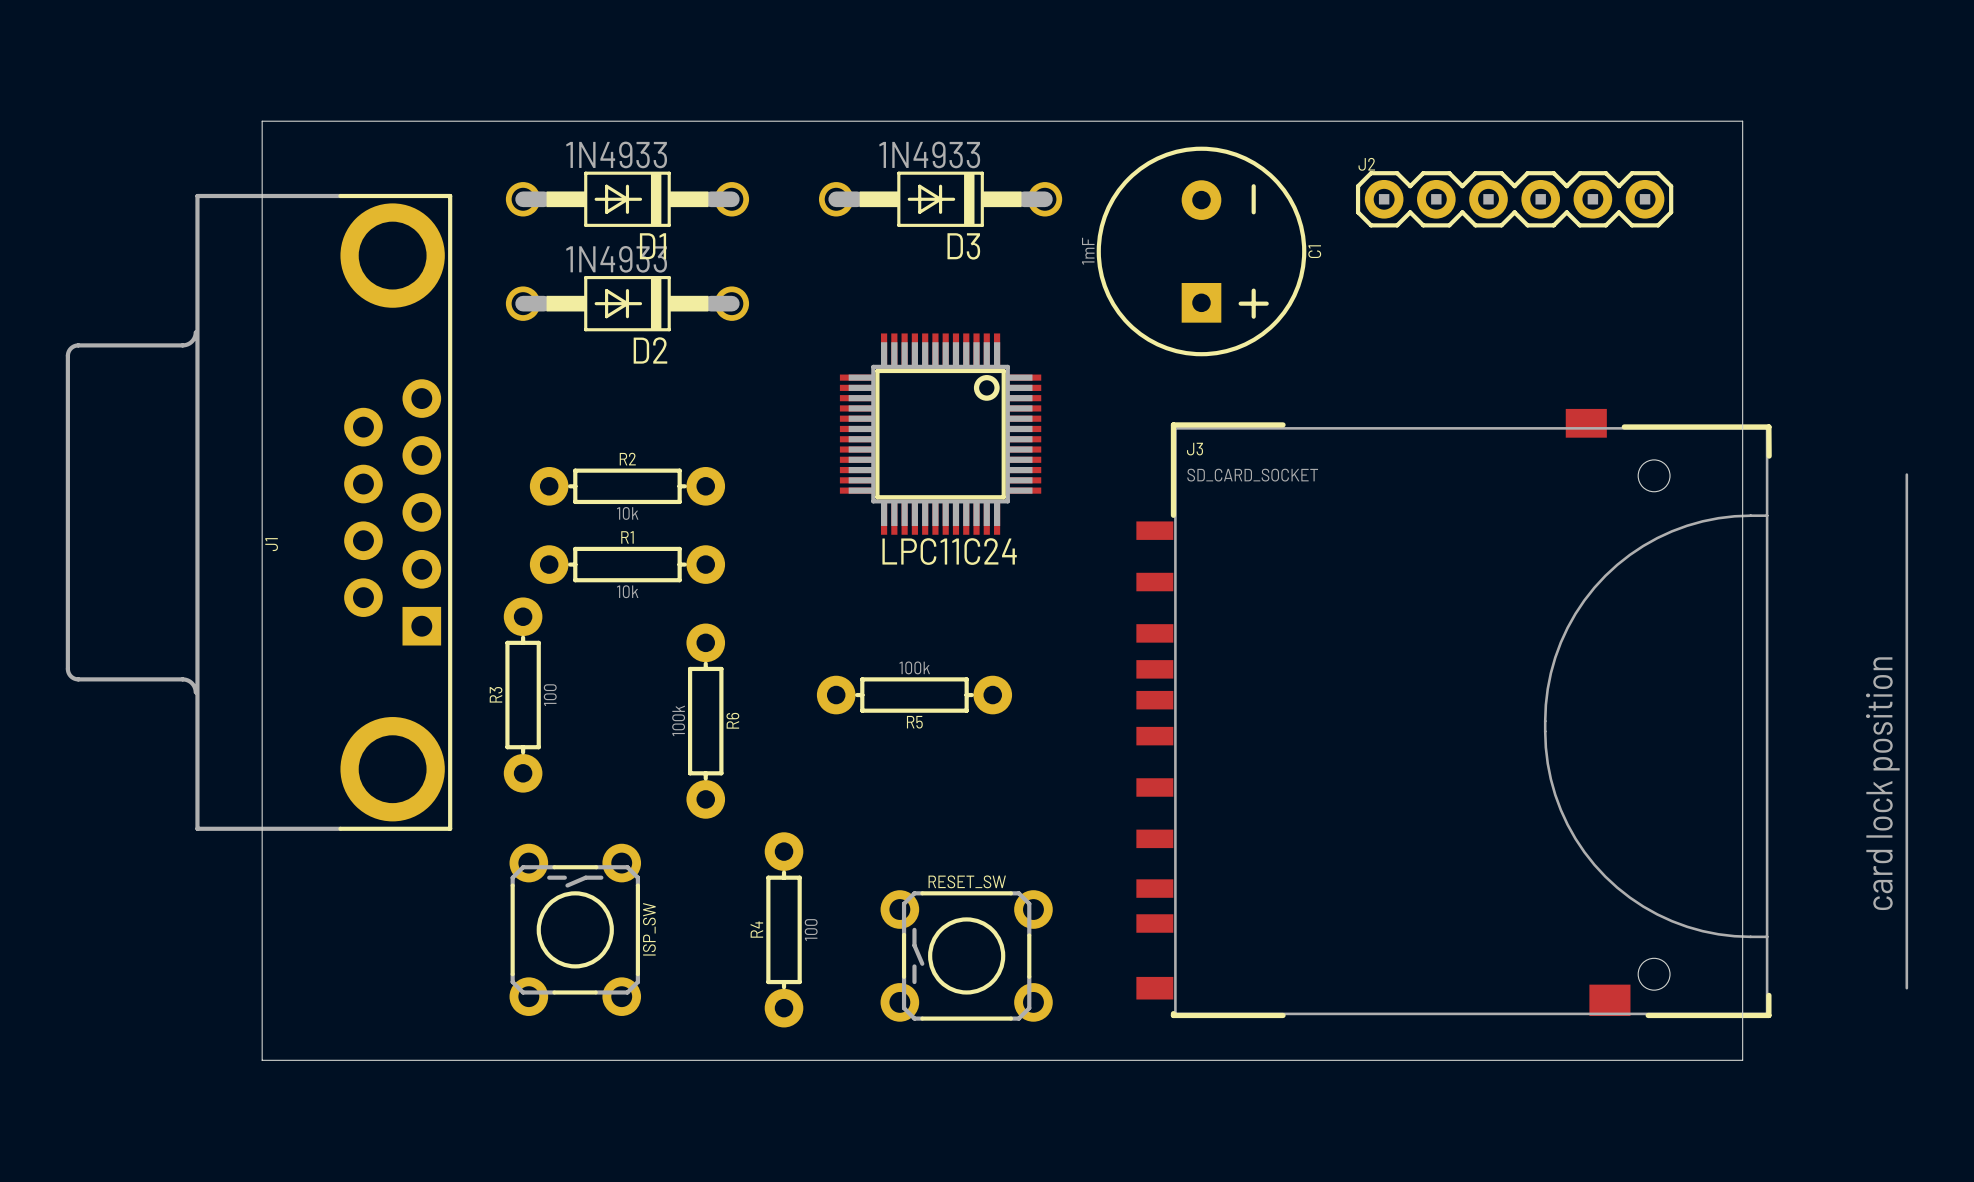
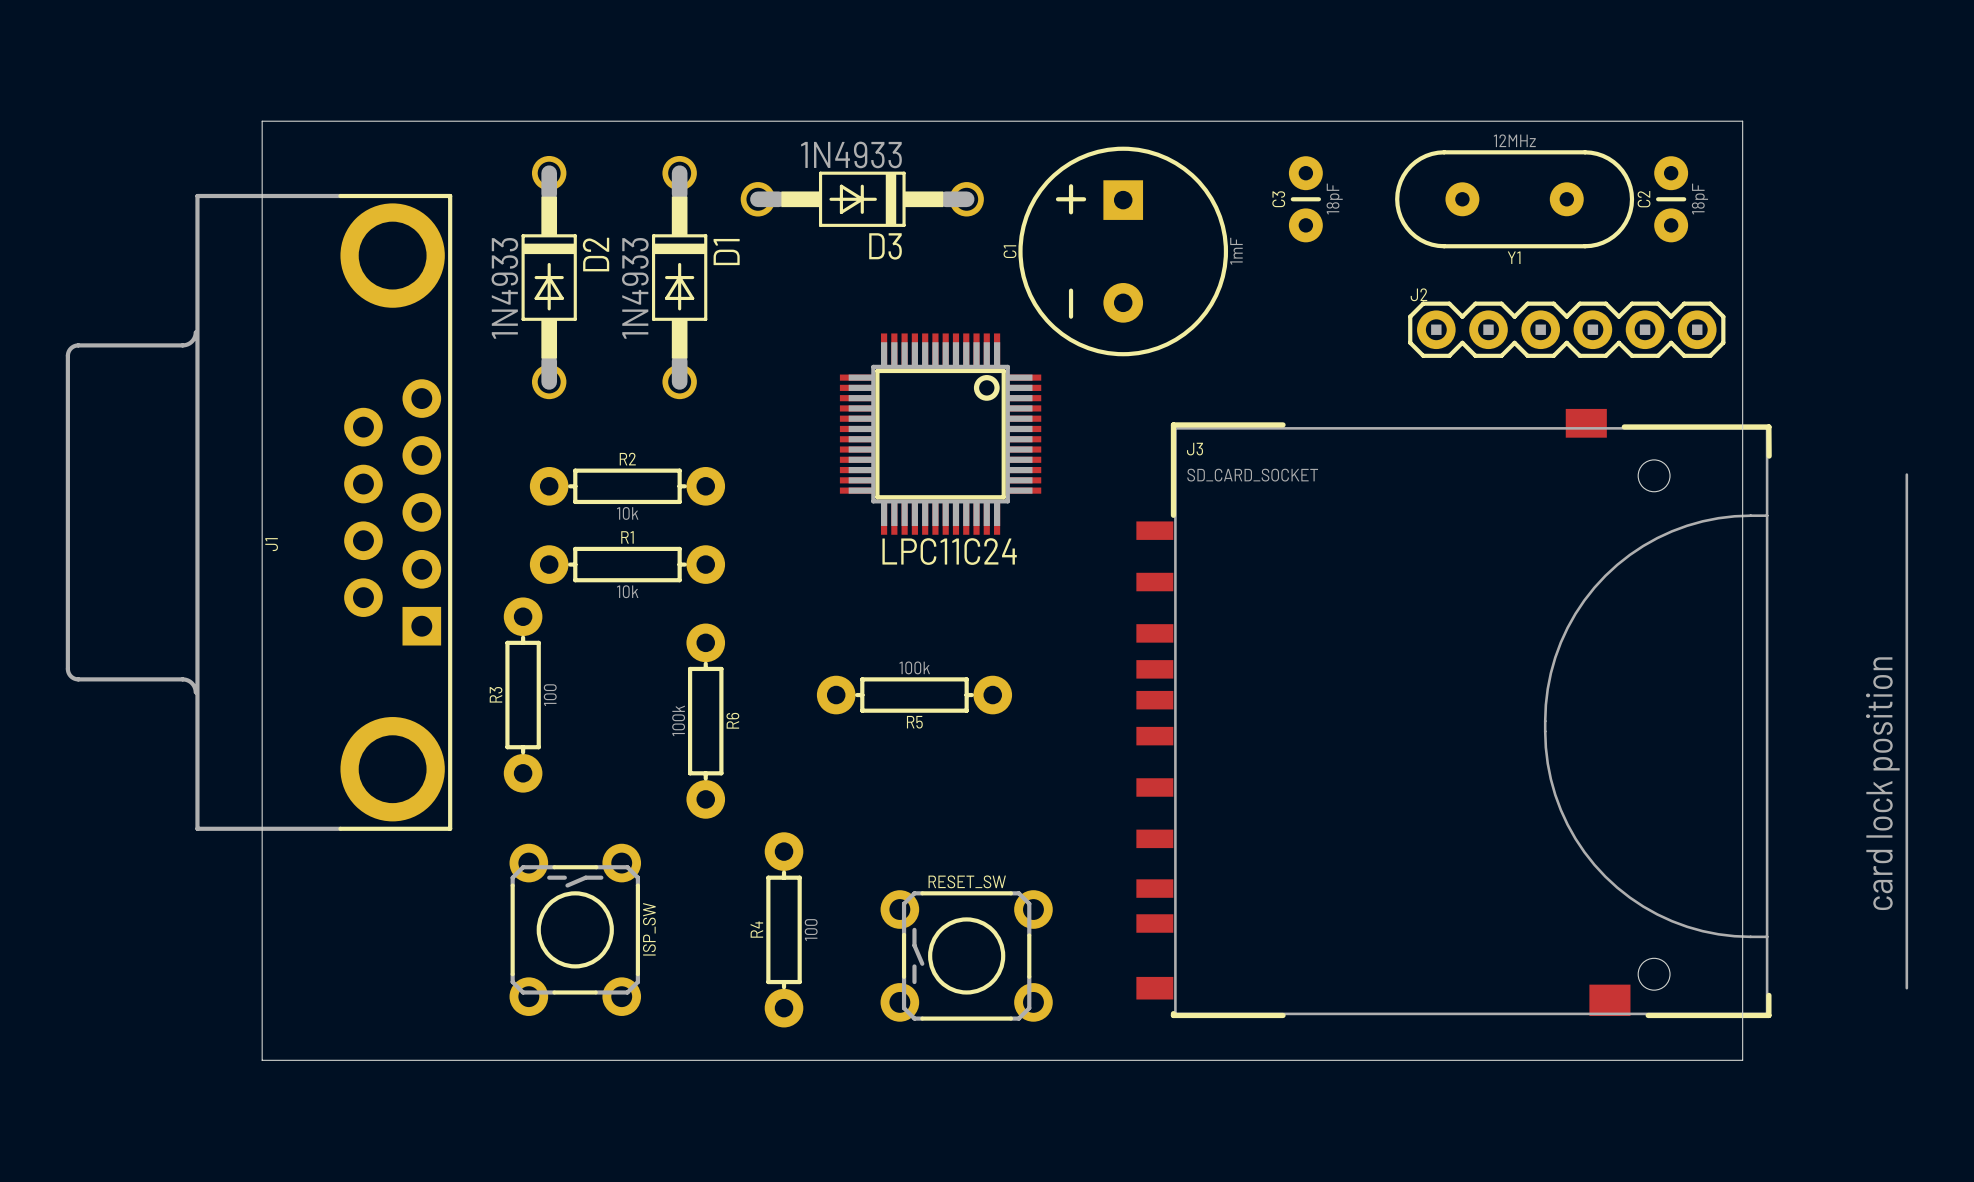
D1 rotation: 0° (627, 199) -> 90° counterclockwise (679, 277)
D3 position: (940, 199) -> (862, 199)
C3: none -> 18pF (1305, 199)
J2 position: (1514, 199) -> (1566, 329)
Y1: none -> 12MHz (1514, 199)
C2: none -> 18pF (1671, 199)
C1 rotation: 0° (1201, 251) -> 180° (1123, 251)
D2 rotation: 0° (627, 303) -> 90° counterclockwise (549, 277)

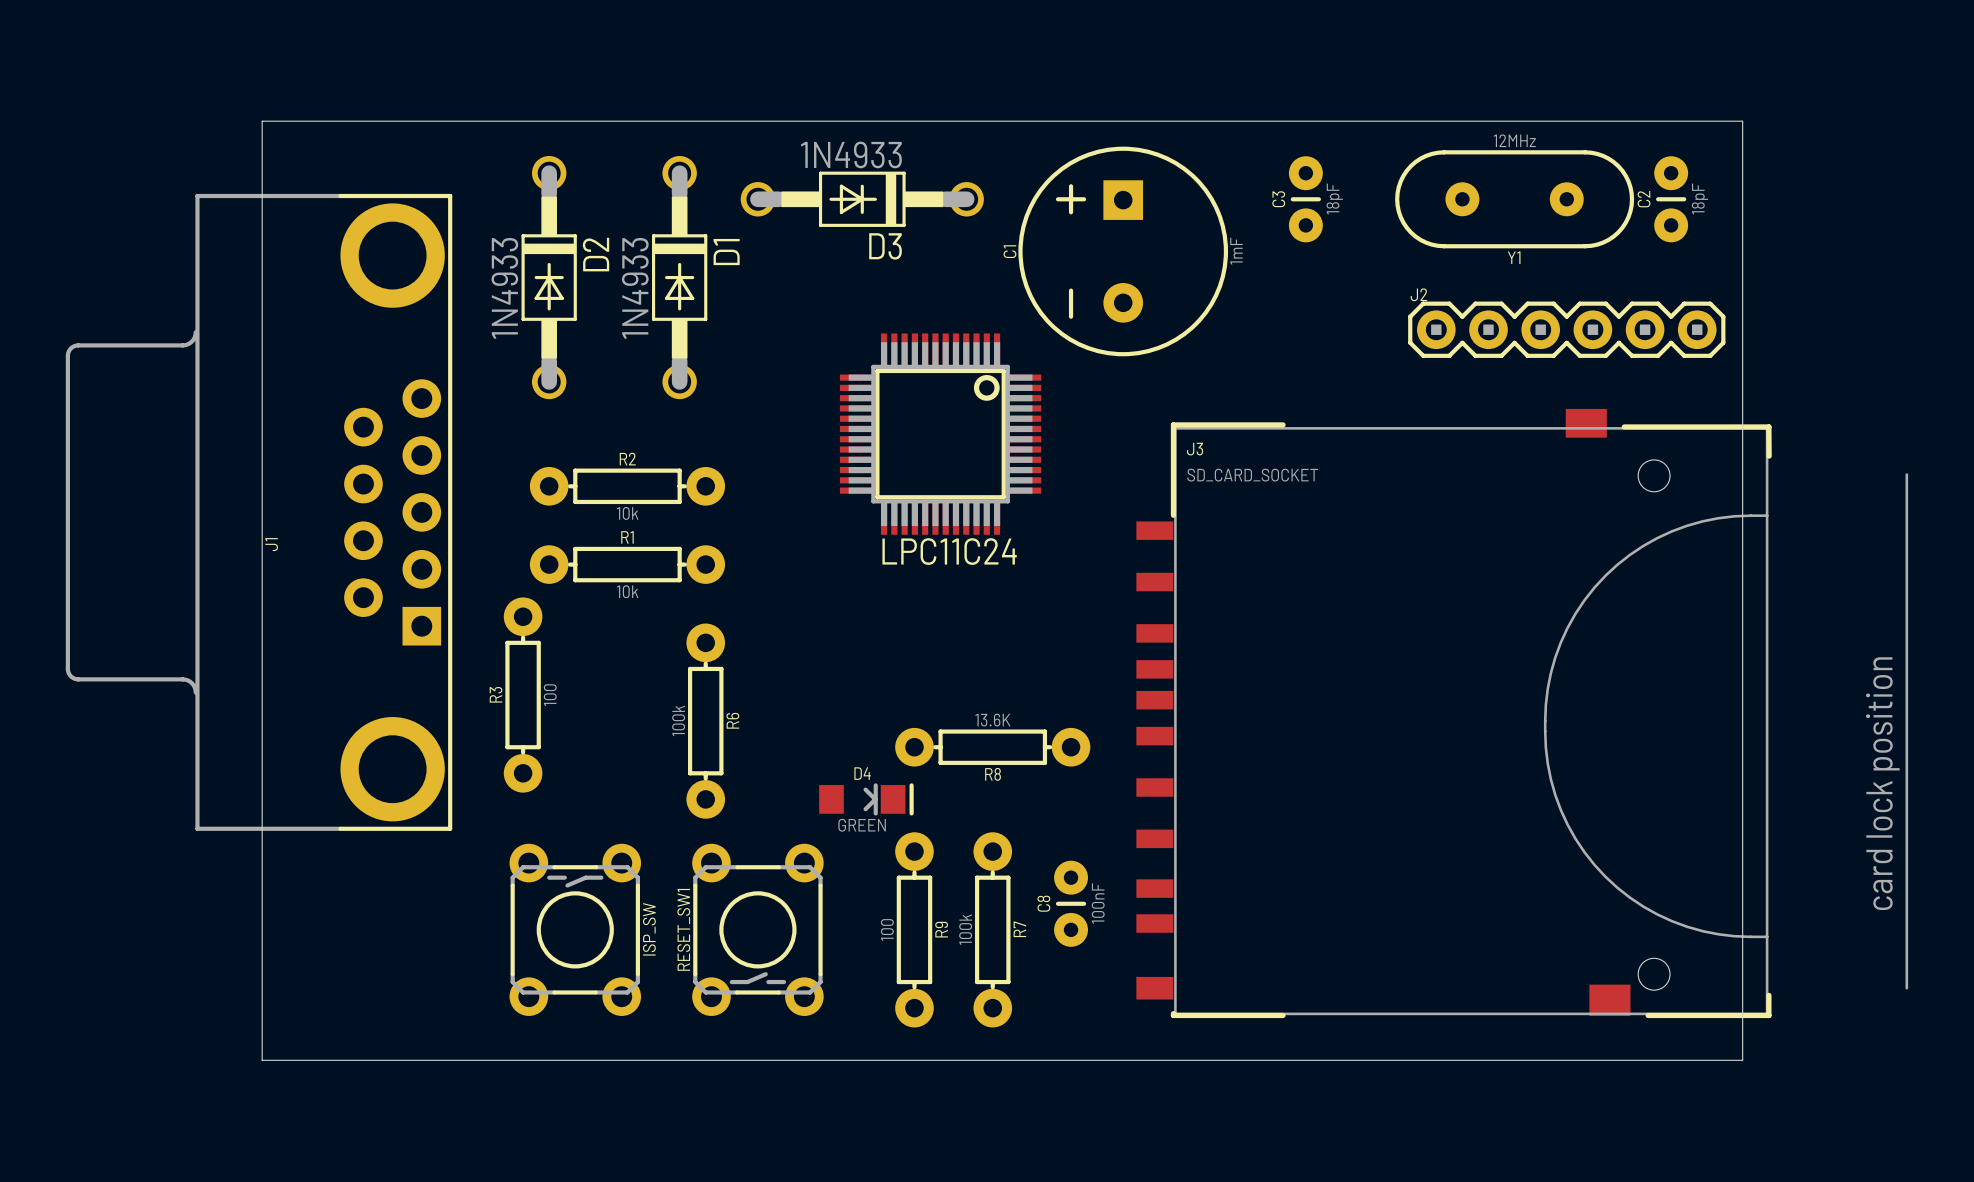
R5: 100k (914, 695) -> none
R8: none -> 13.6K (992, 747)
D4: none -> GREEN (866, 799)
C8: none -> 100nF (1071, 903)
RESET_SW1: none -> (757, 929)
R4: 100 (784, 929) -> none
R9: none -> 100 (914, 929)
R7: none -> 100k (992, 929)
RESET_SW: (966, 955) -> none

